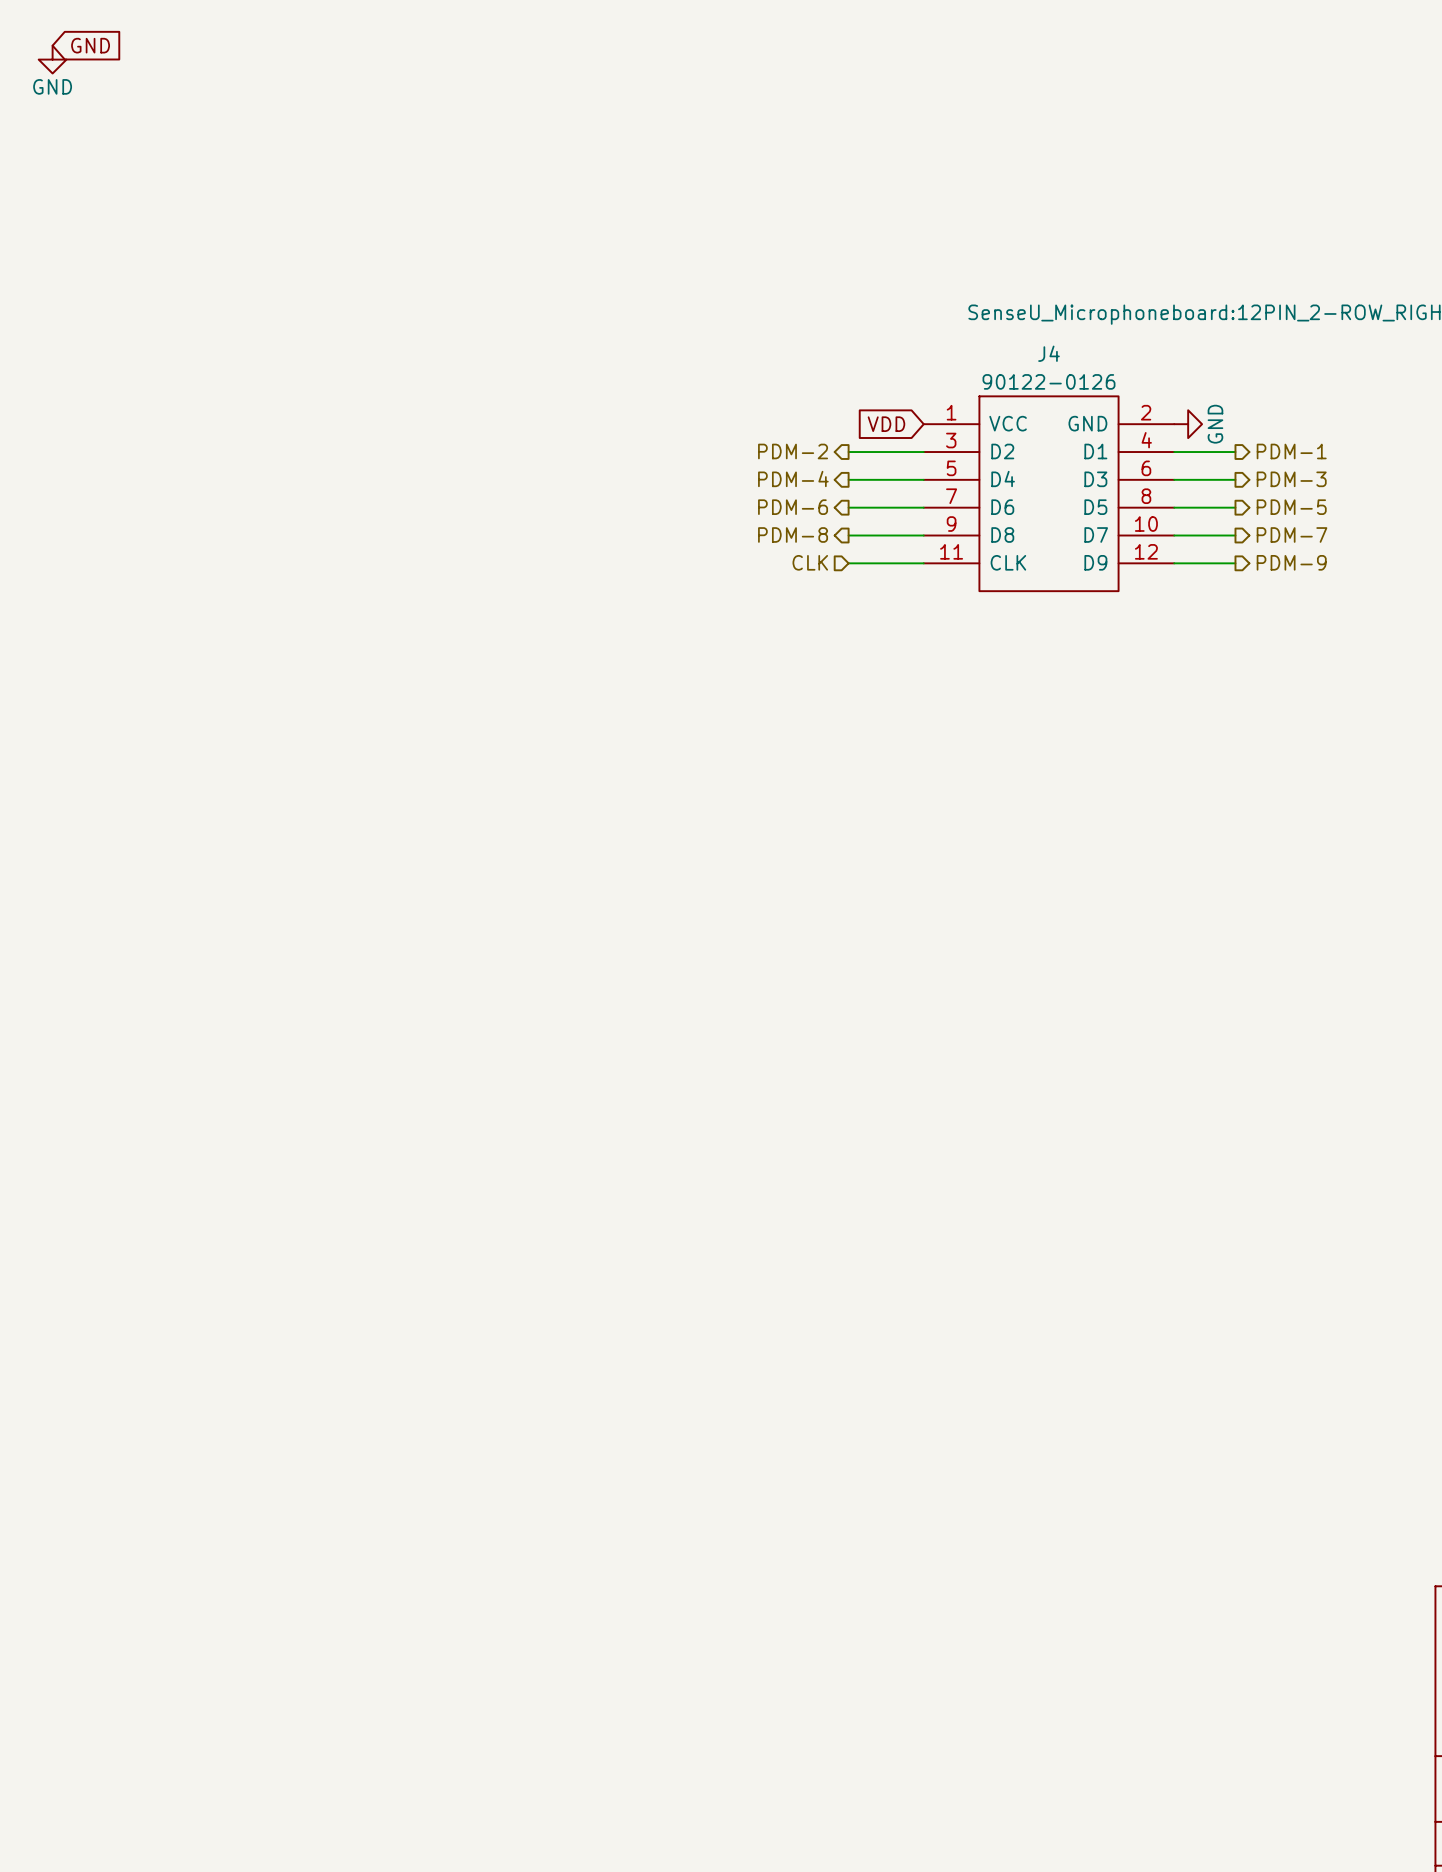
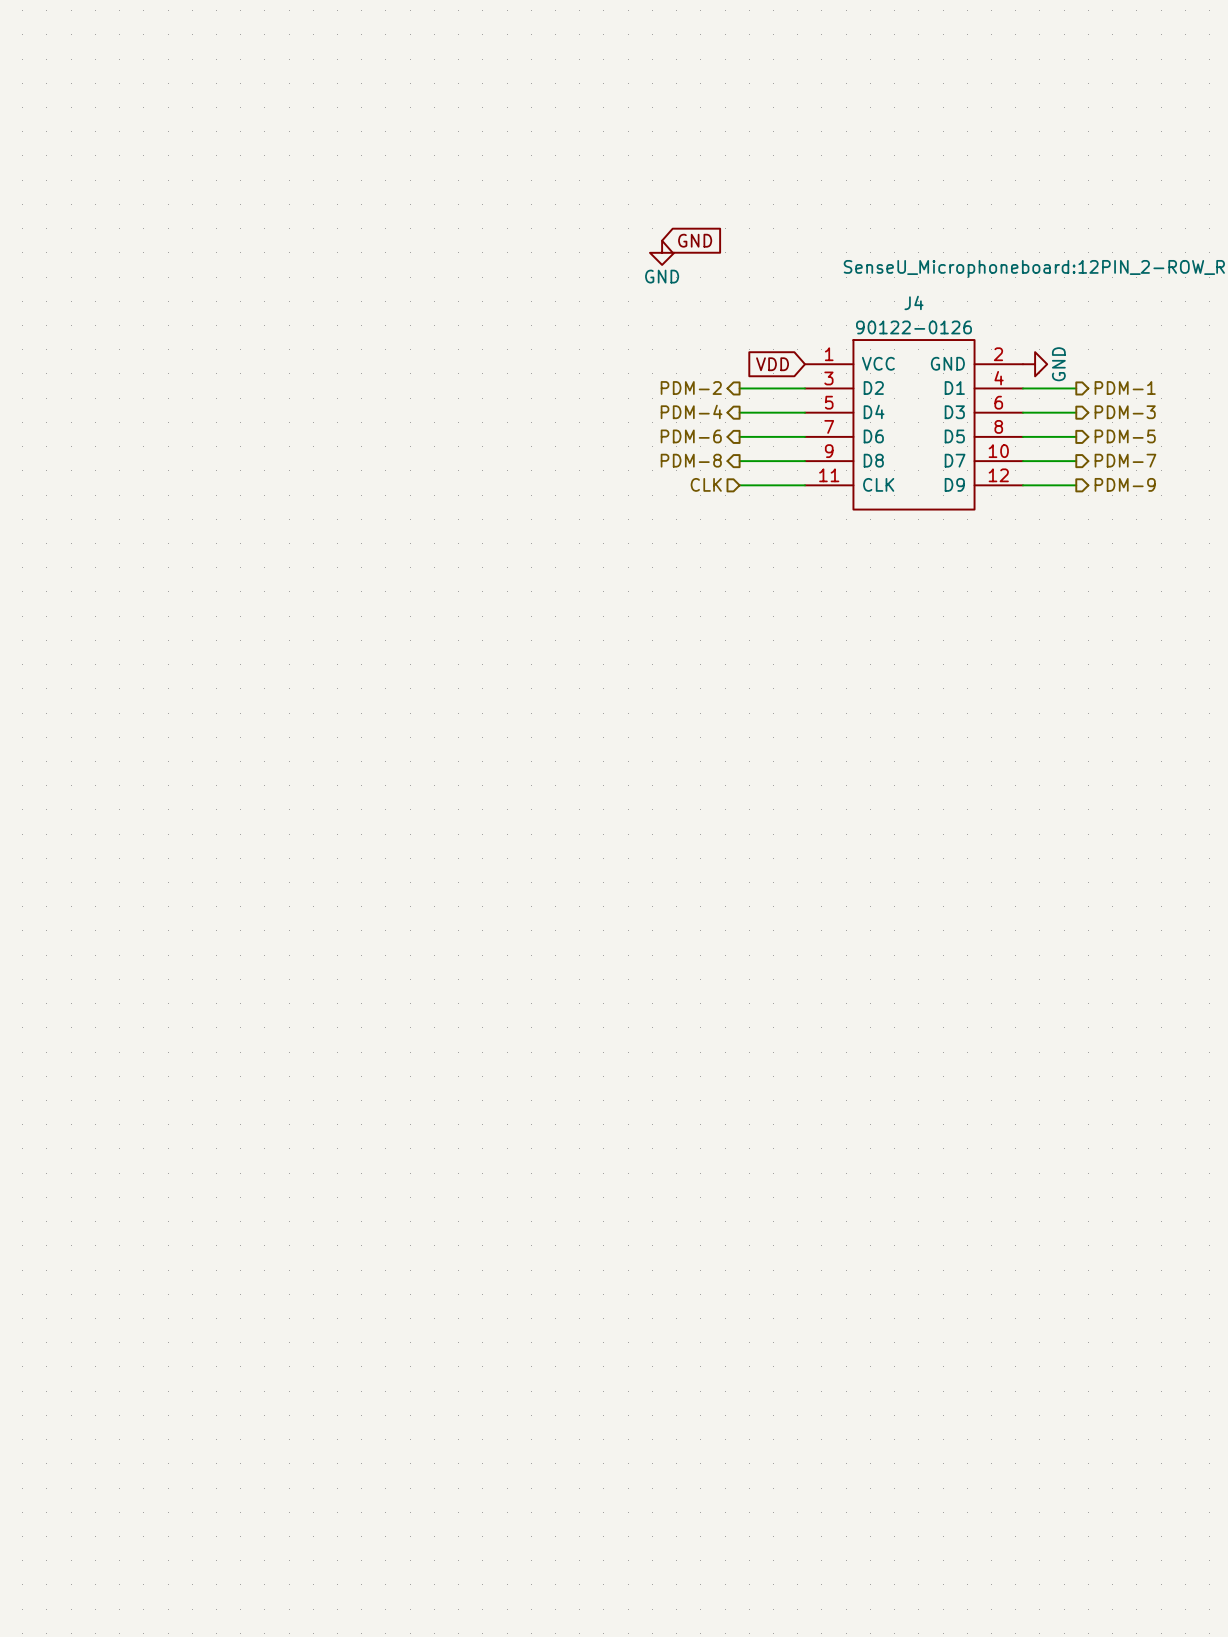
global label: GND (90, 45) -> none
power symbol: GND (52, 59) -> none
global label: none -> GND (695, 240)
power symbol: none -> GND (662, 252)

